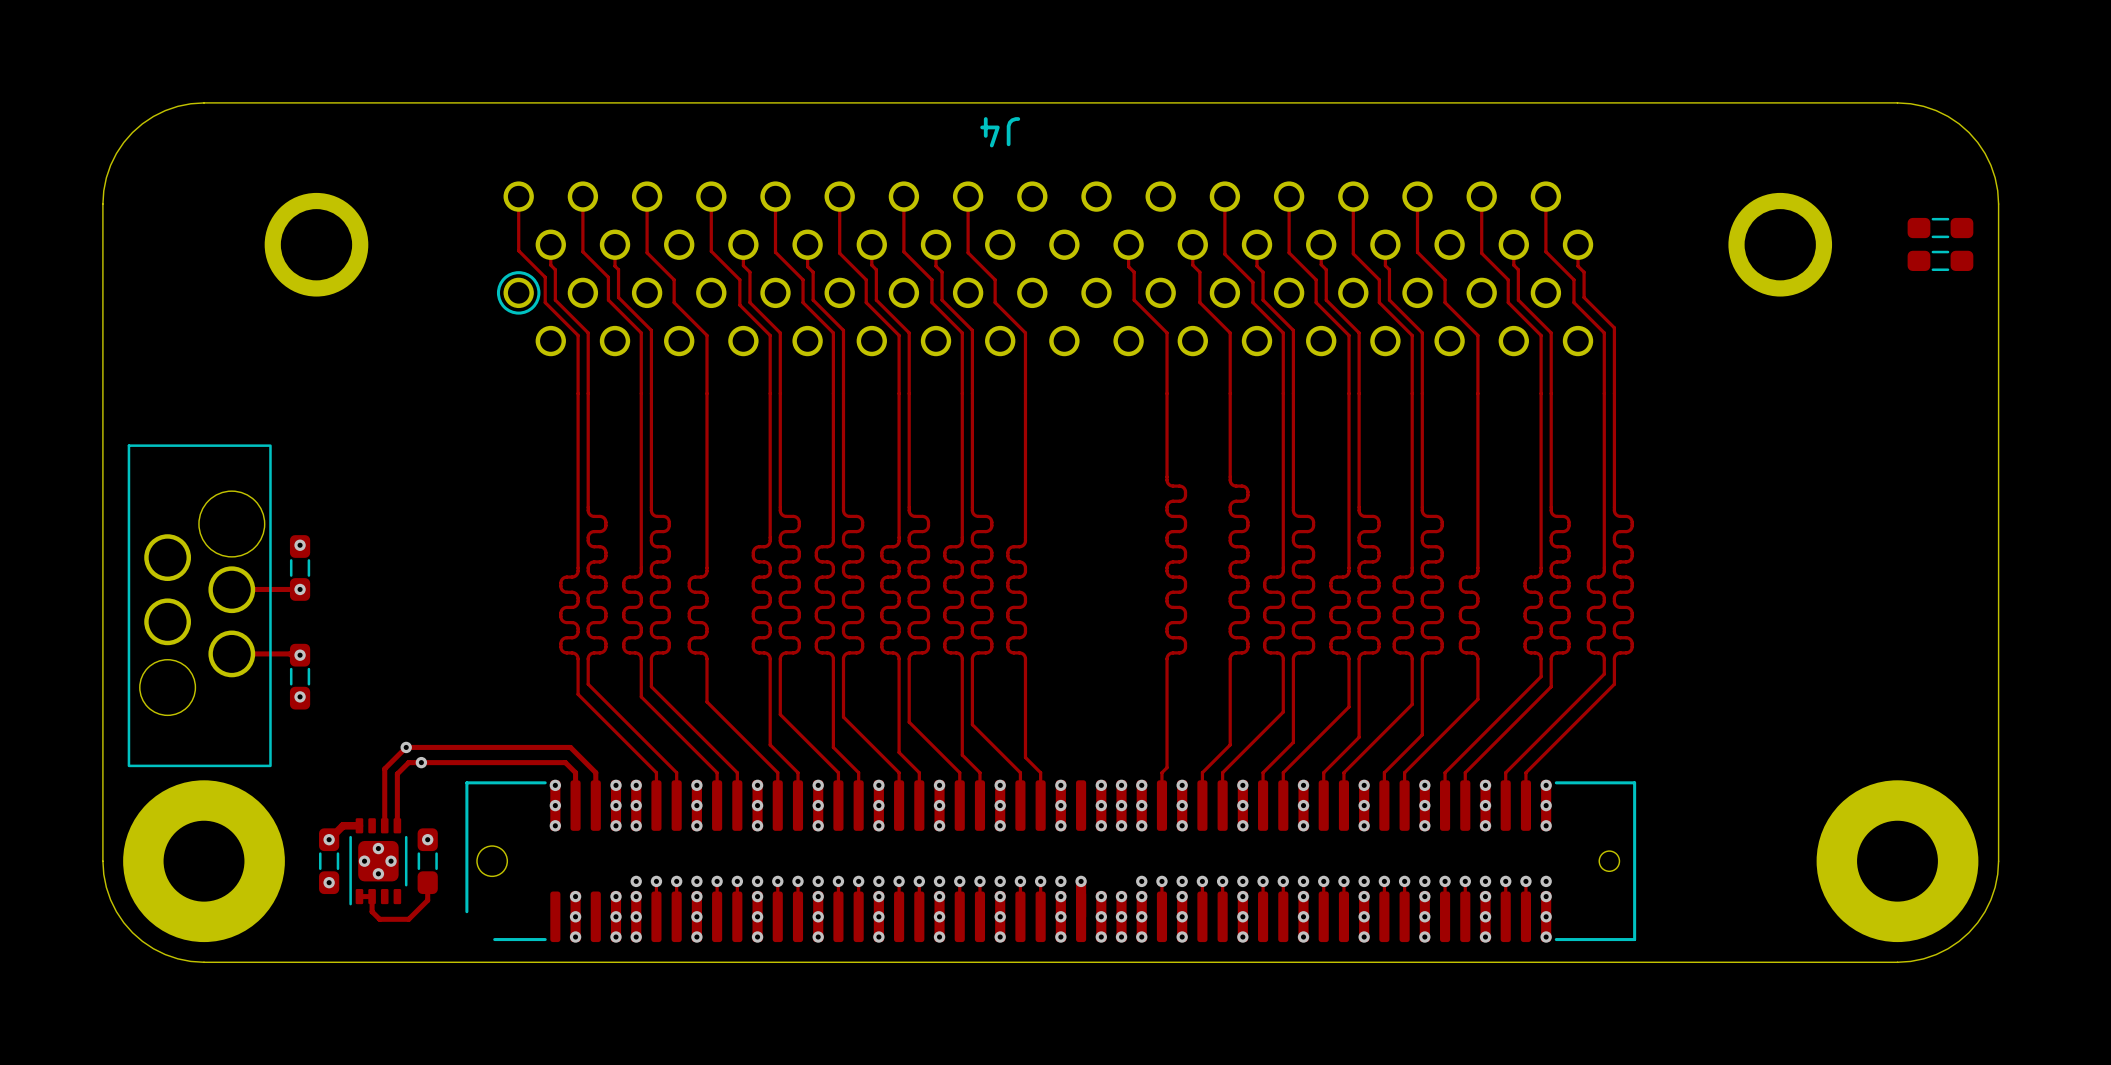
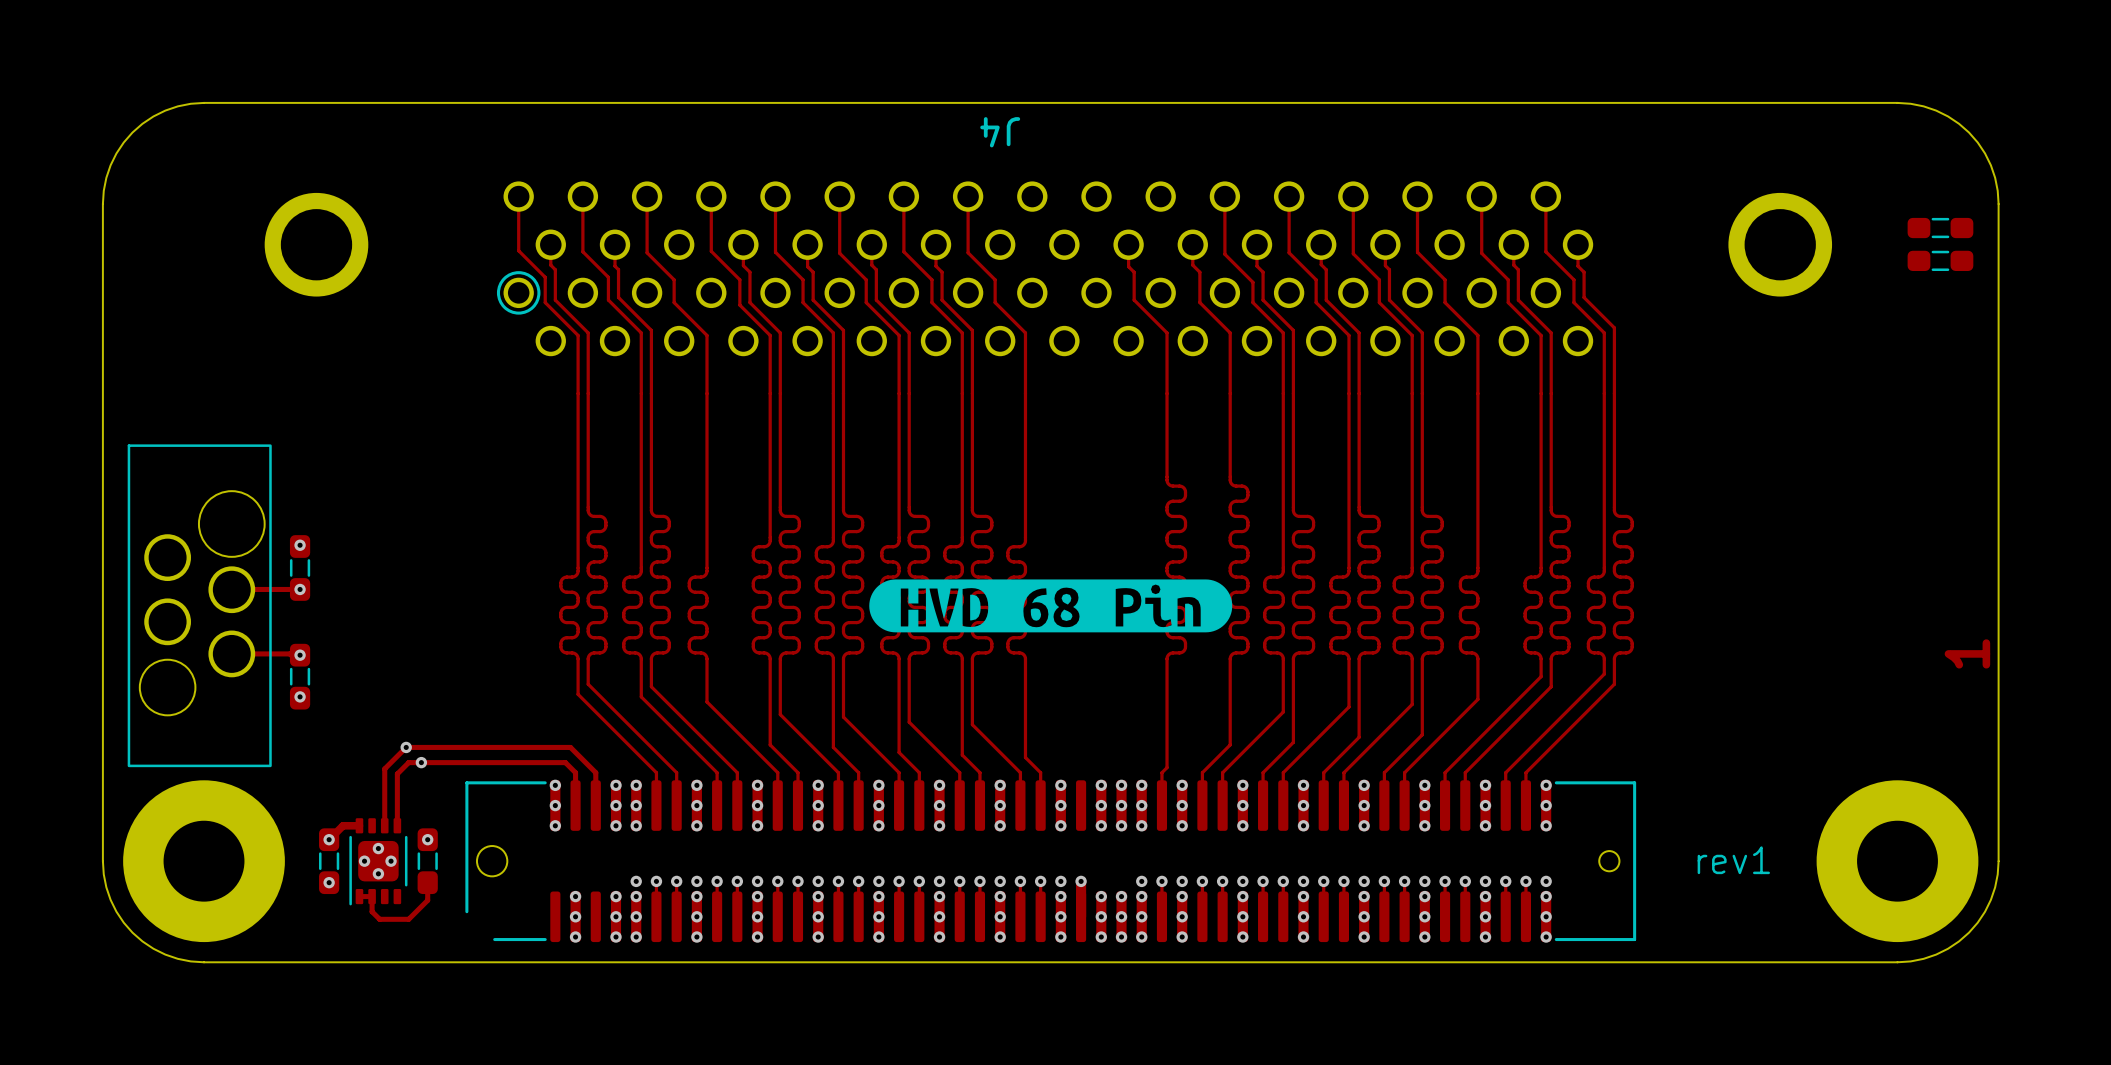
drawing: none -> [869, 579, 1233, 633]
text: none -> 1 (1967, 653)
text: none -> rev1 (1733, 860)

